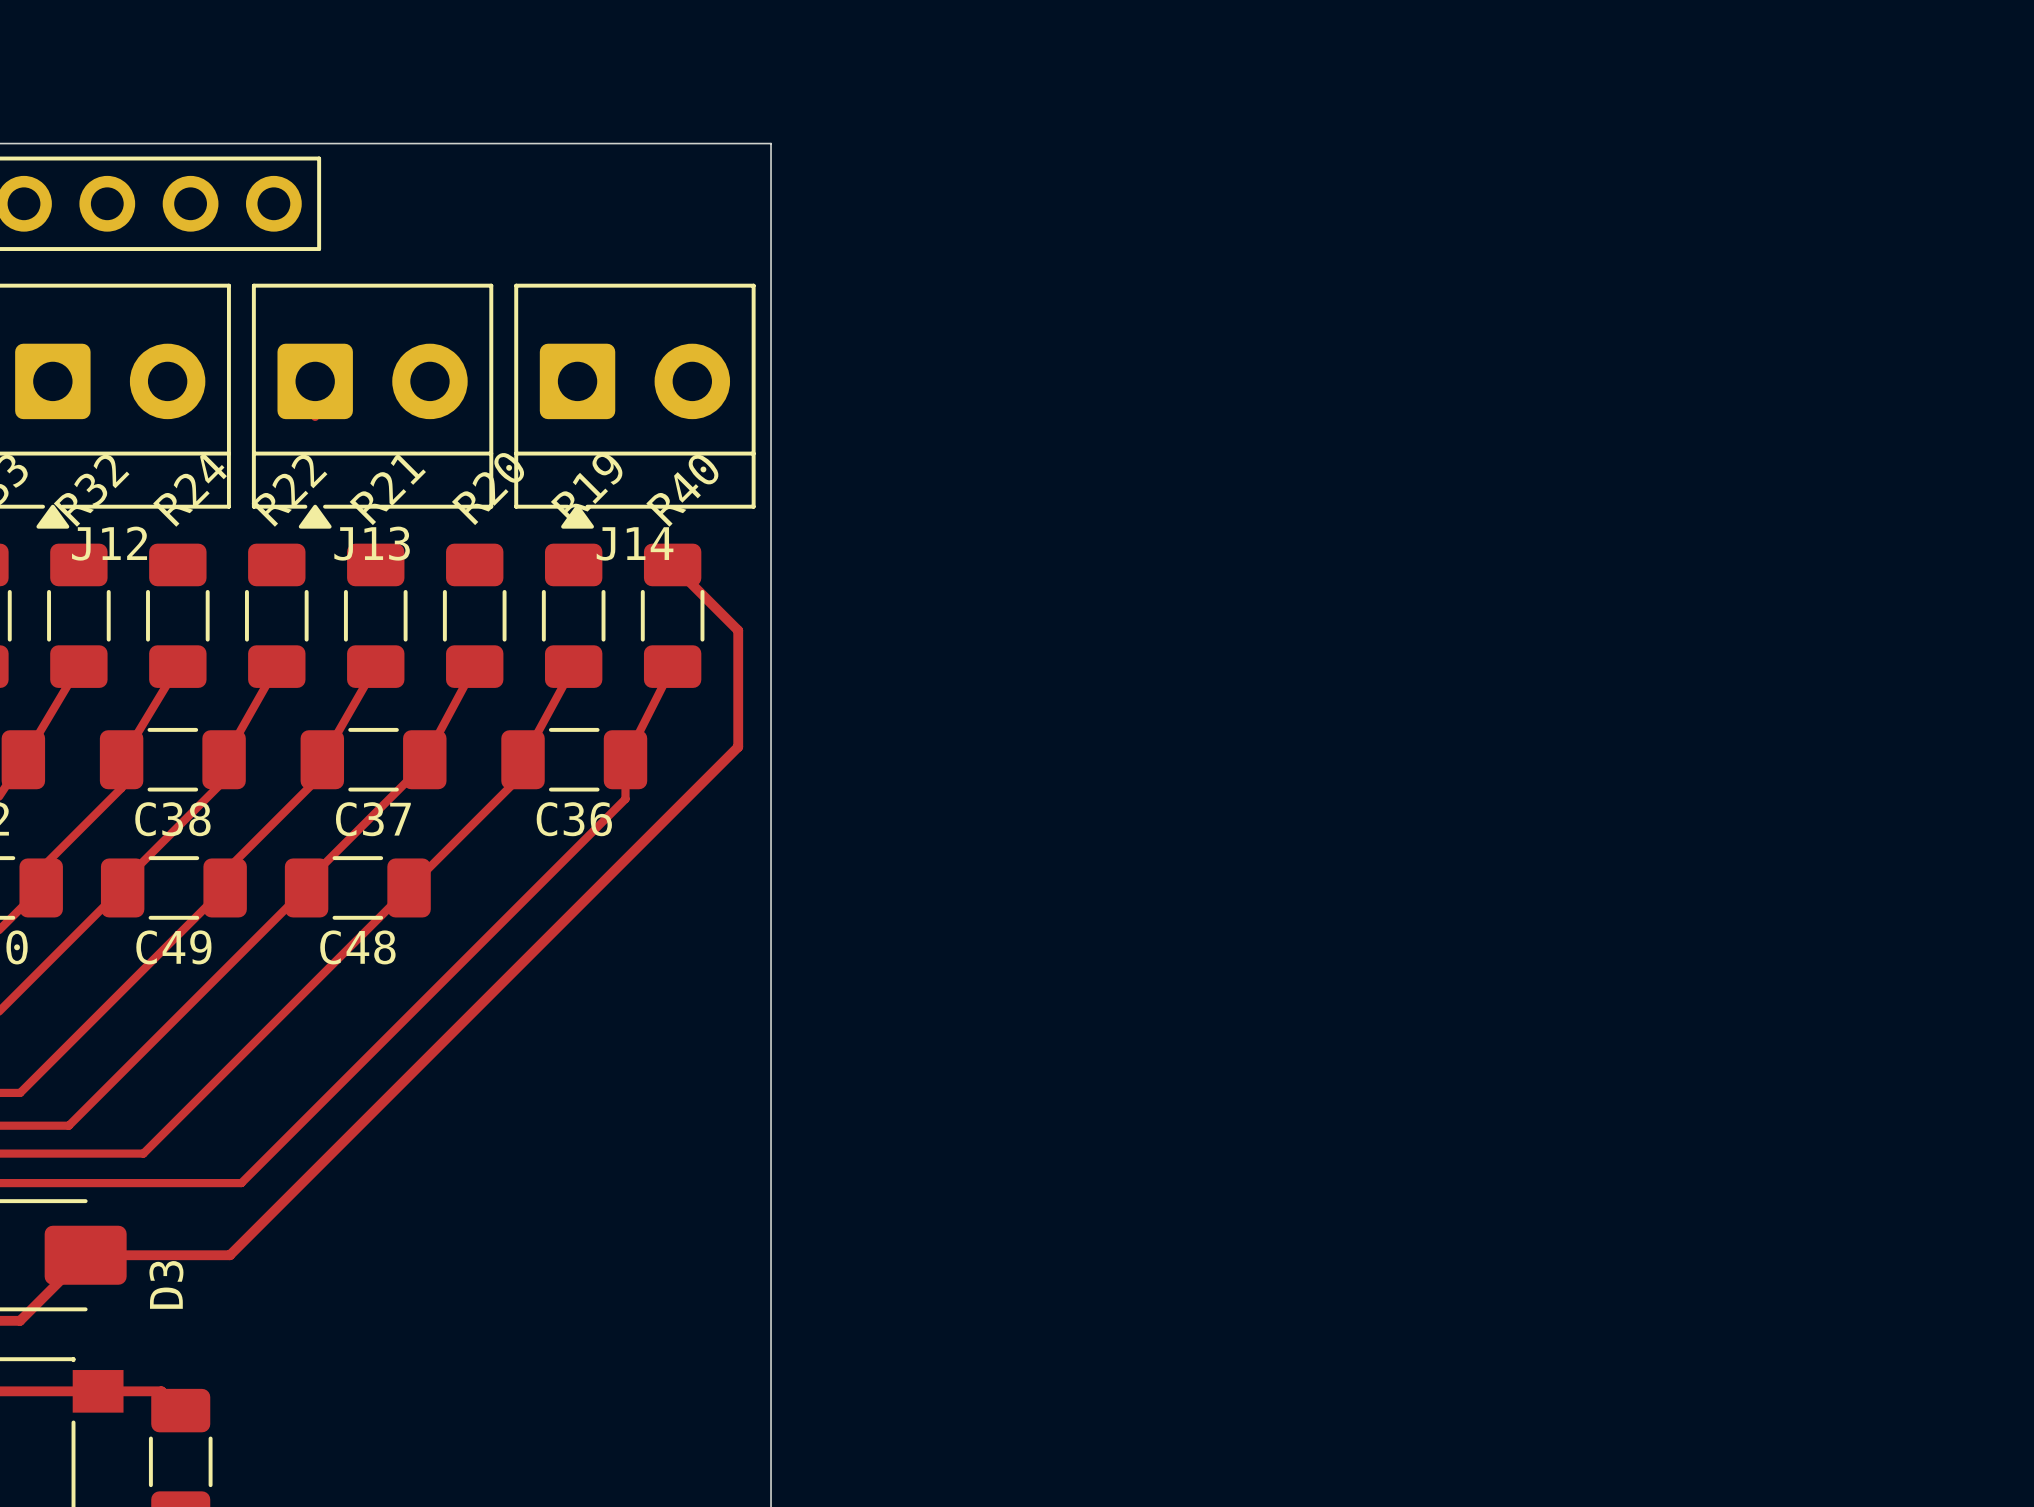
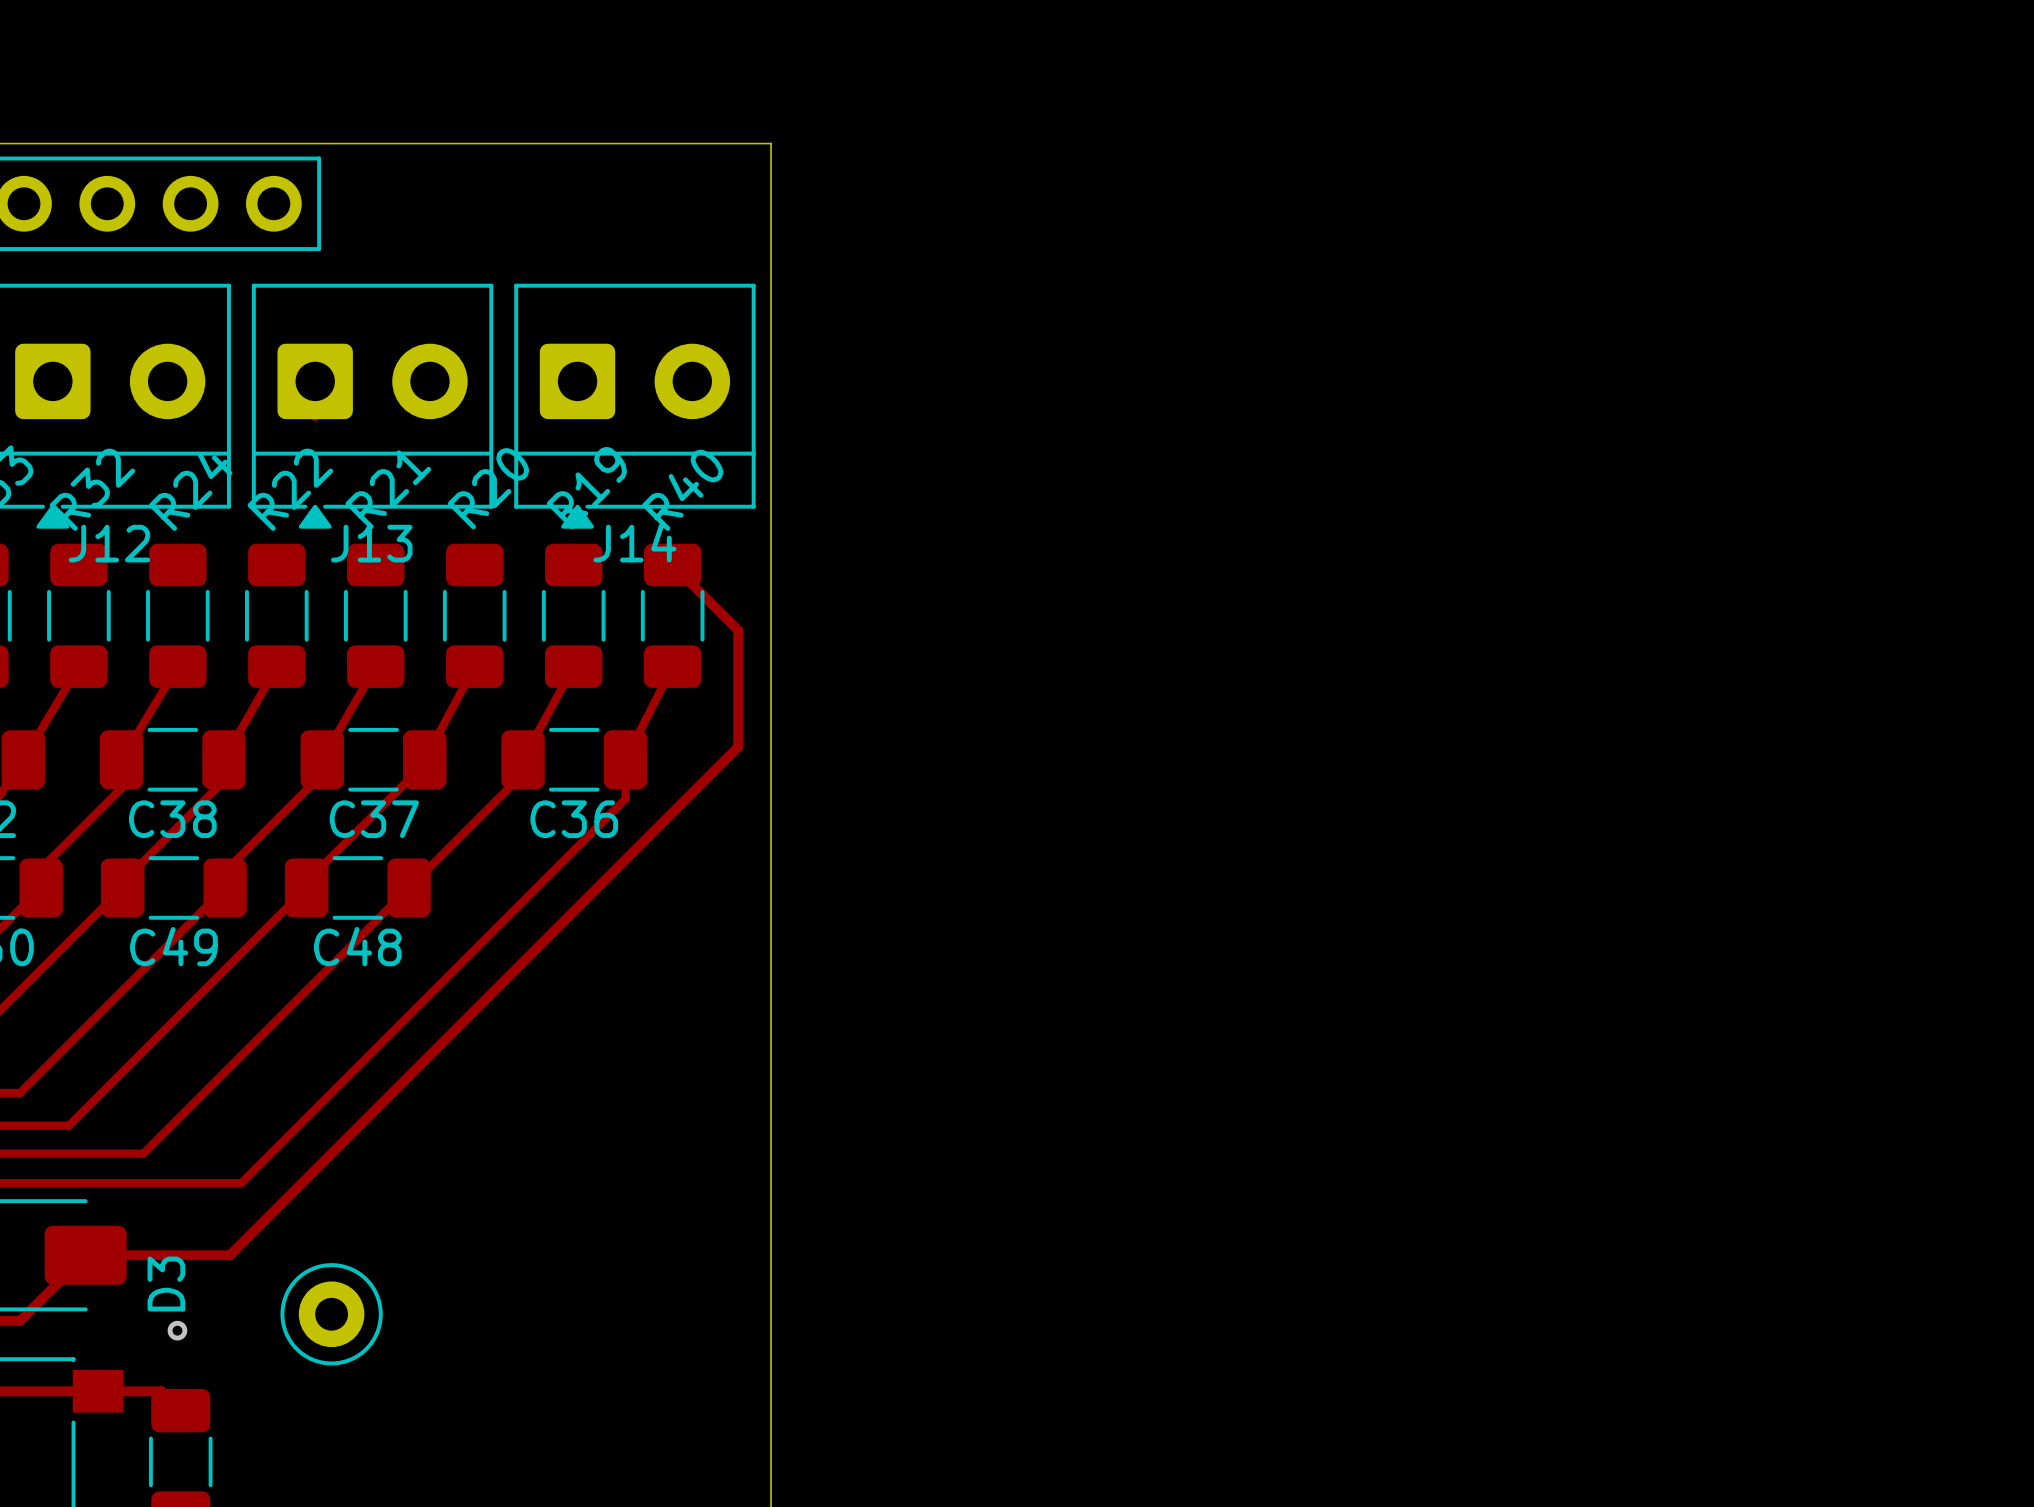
part: none -> (331, 1314)
via: none -> (177, 1330)

